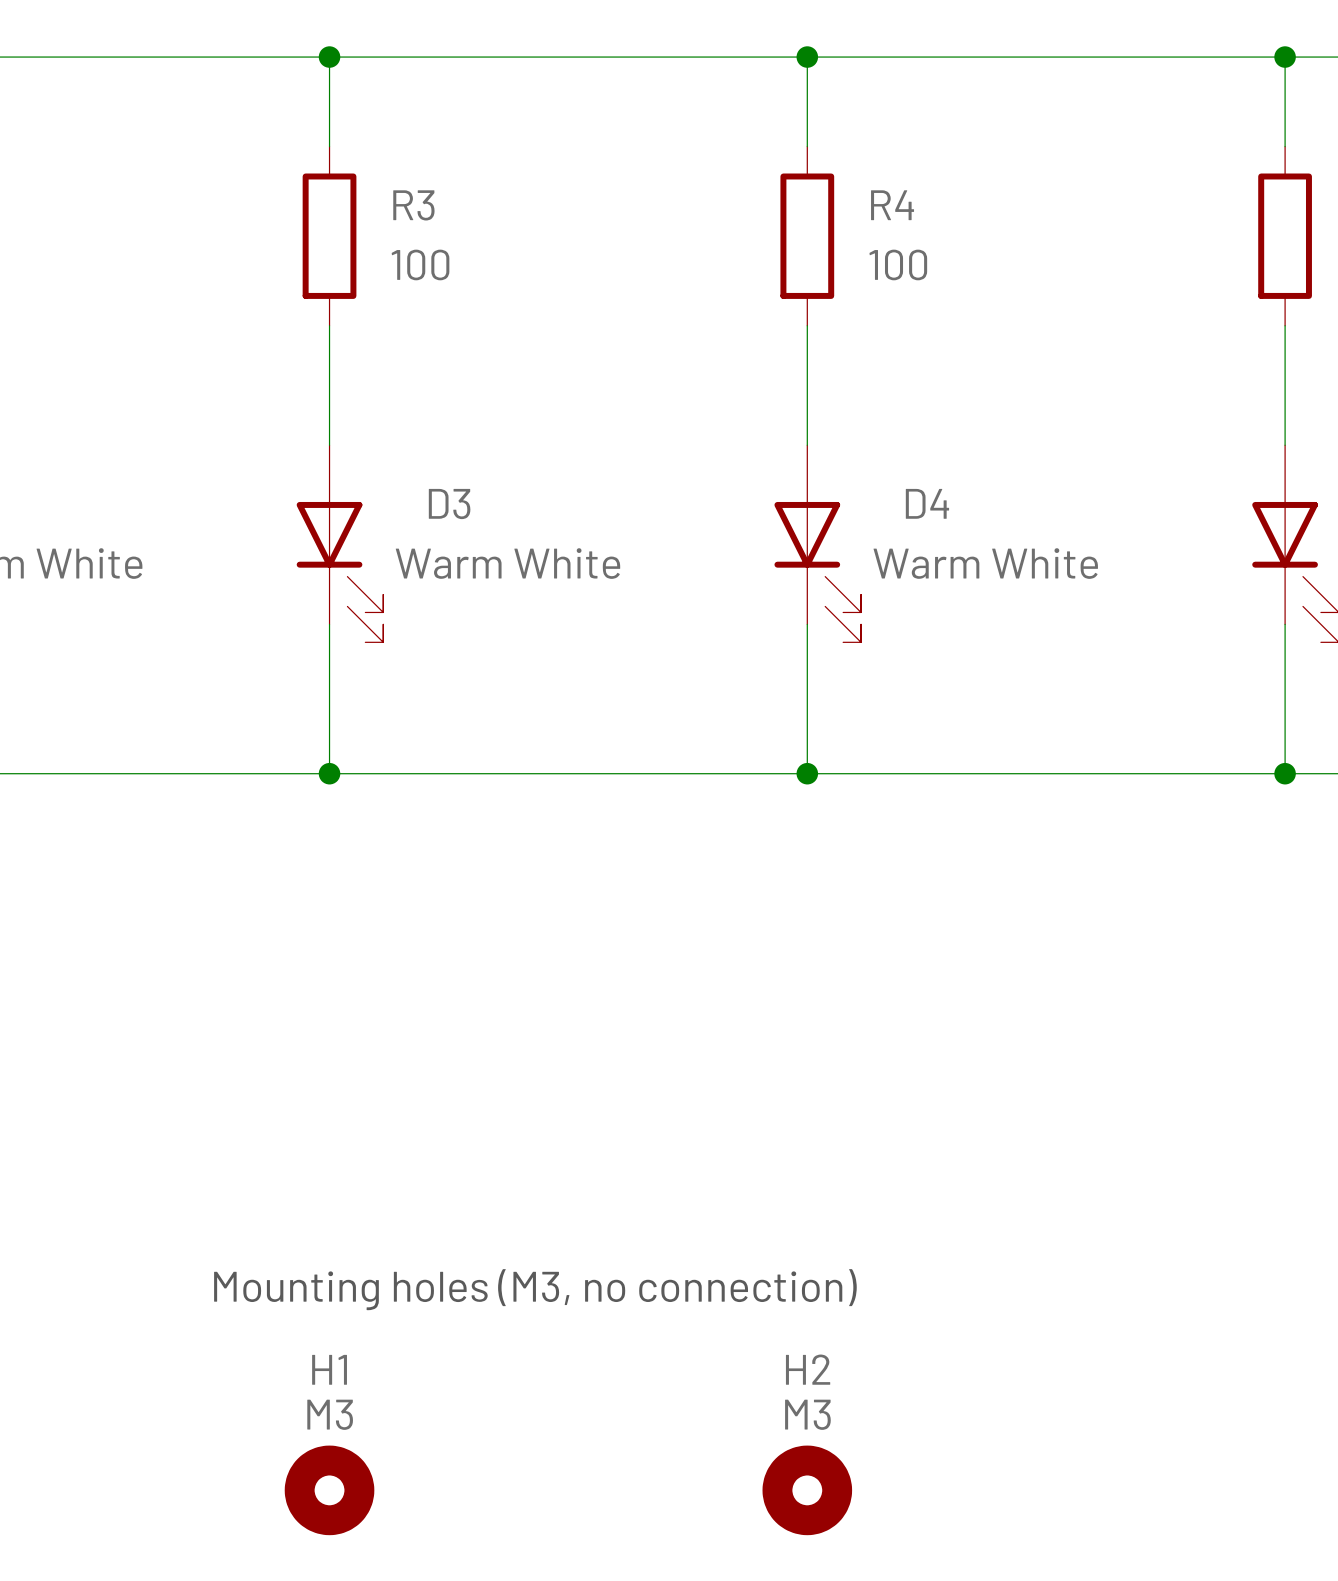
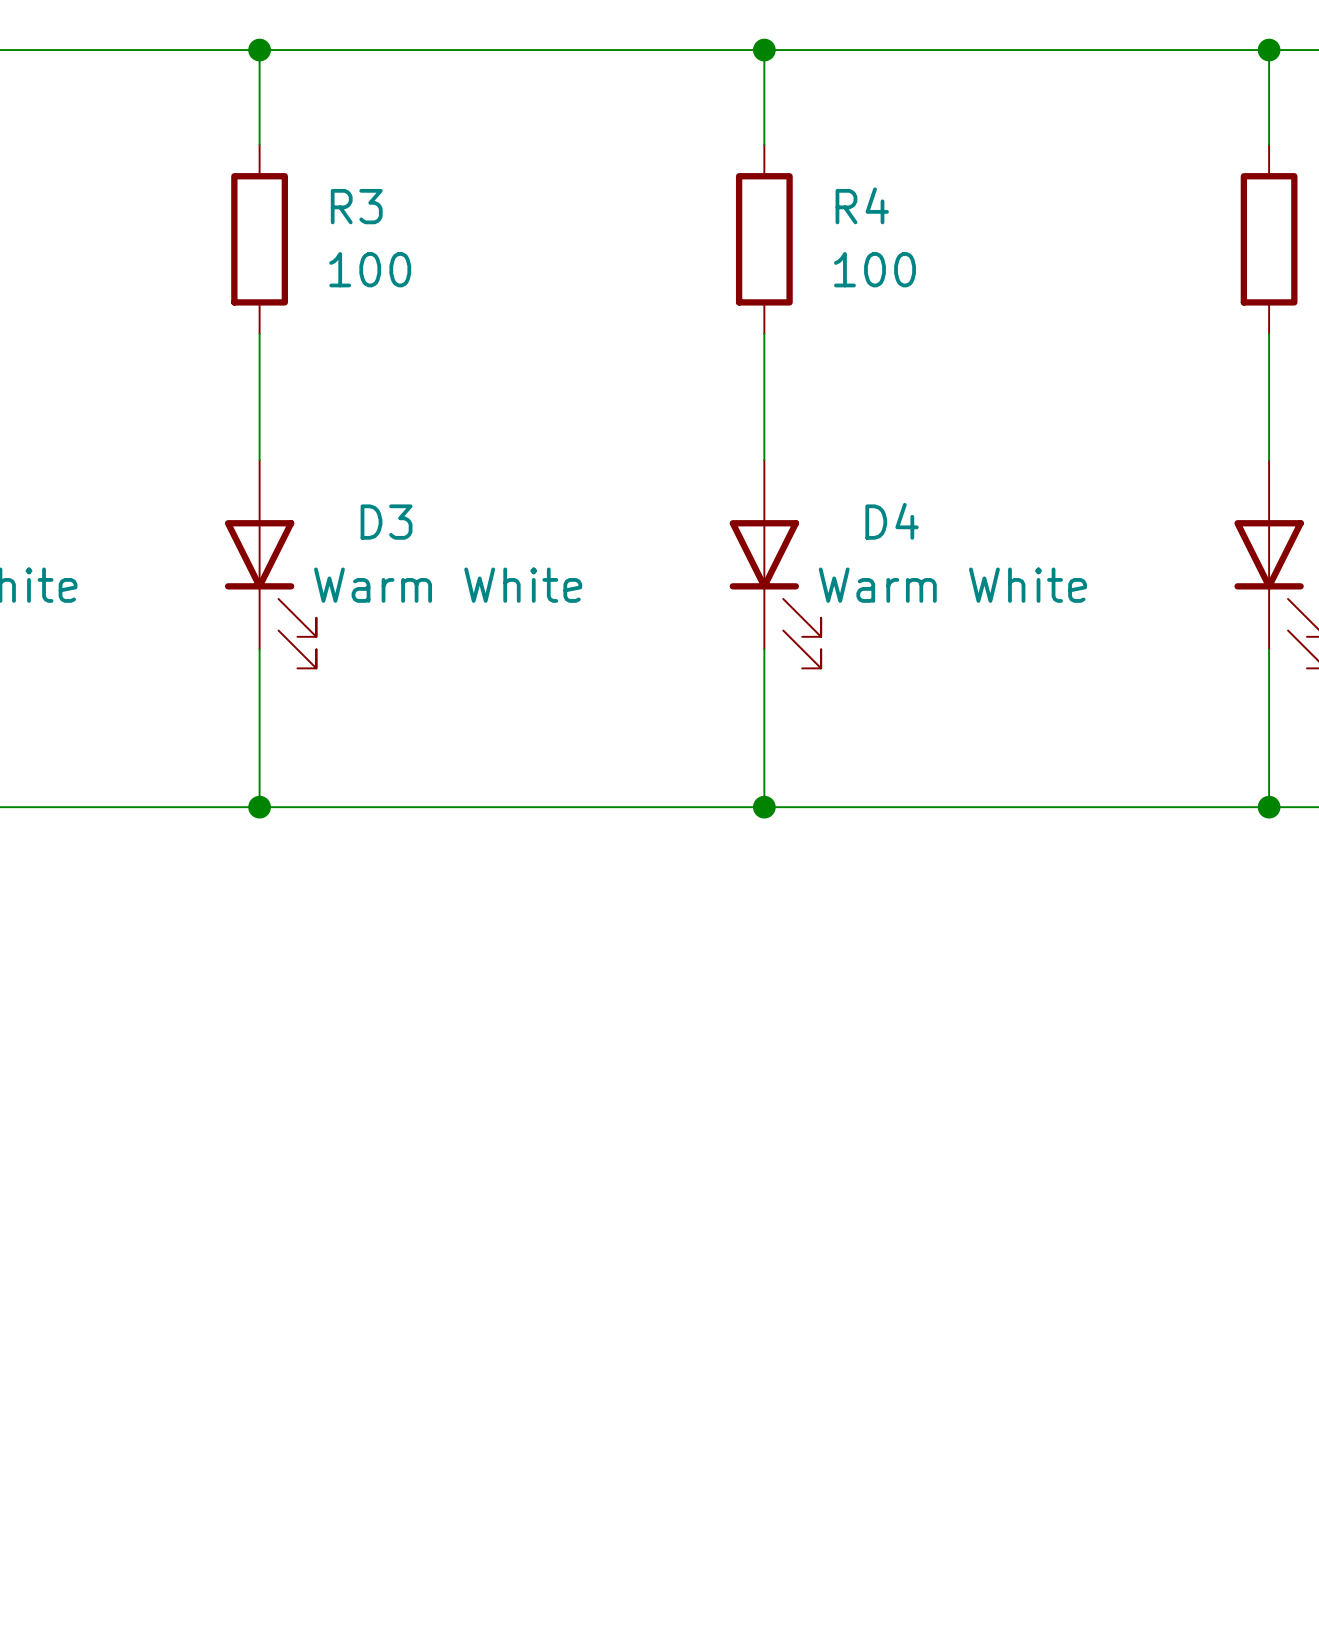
text: Mounting holes (M3, no connection) (535, 1289) -> none
H1: M3 (329, 1490) -> none
H2: M3 (807, 1490) -> none

